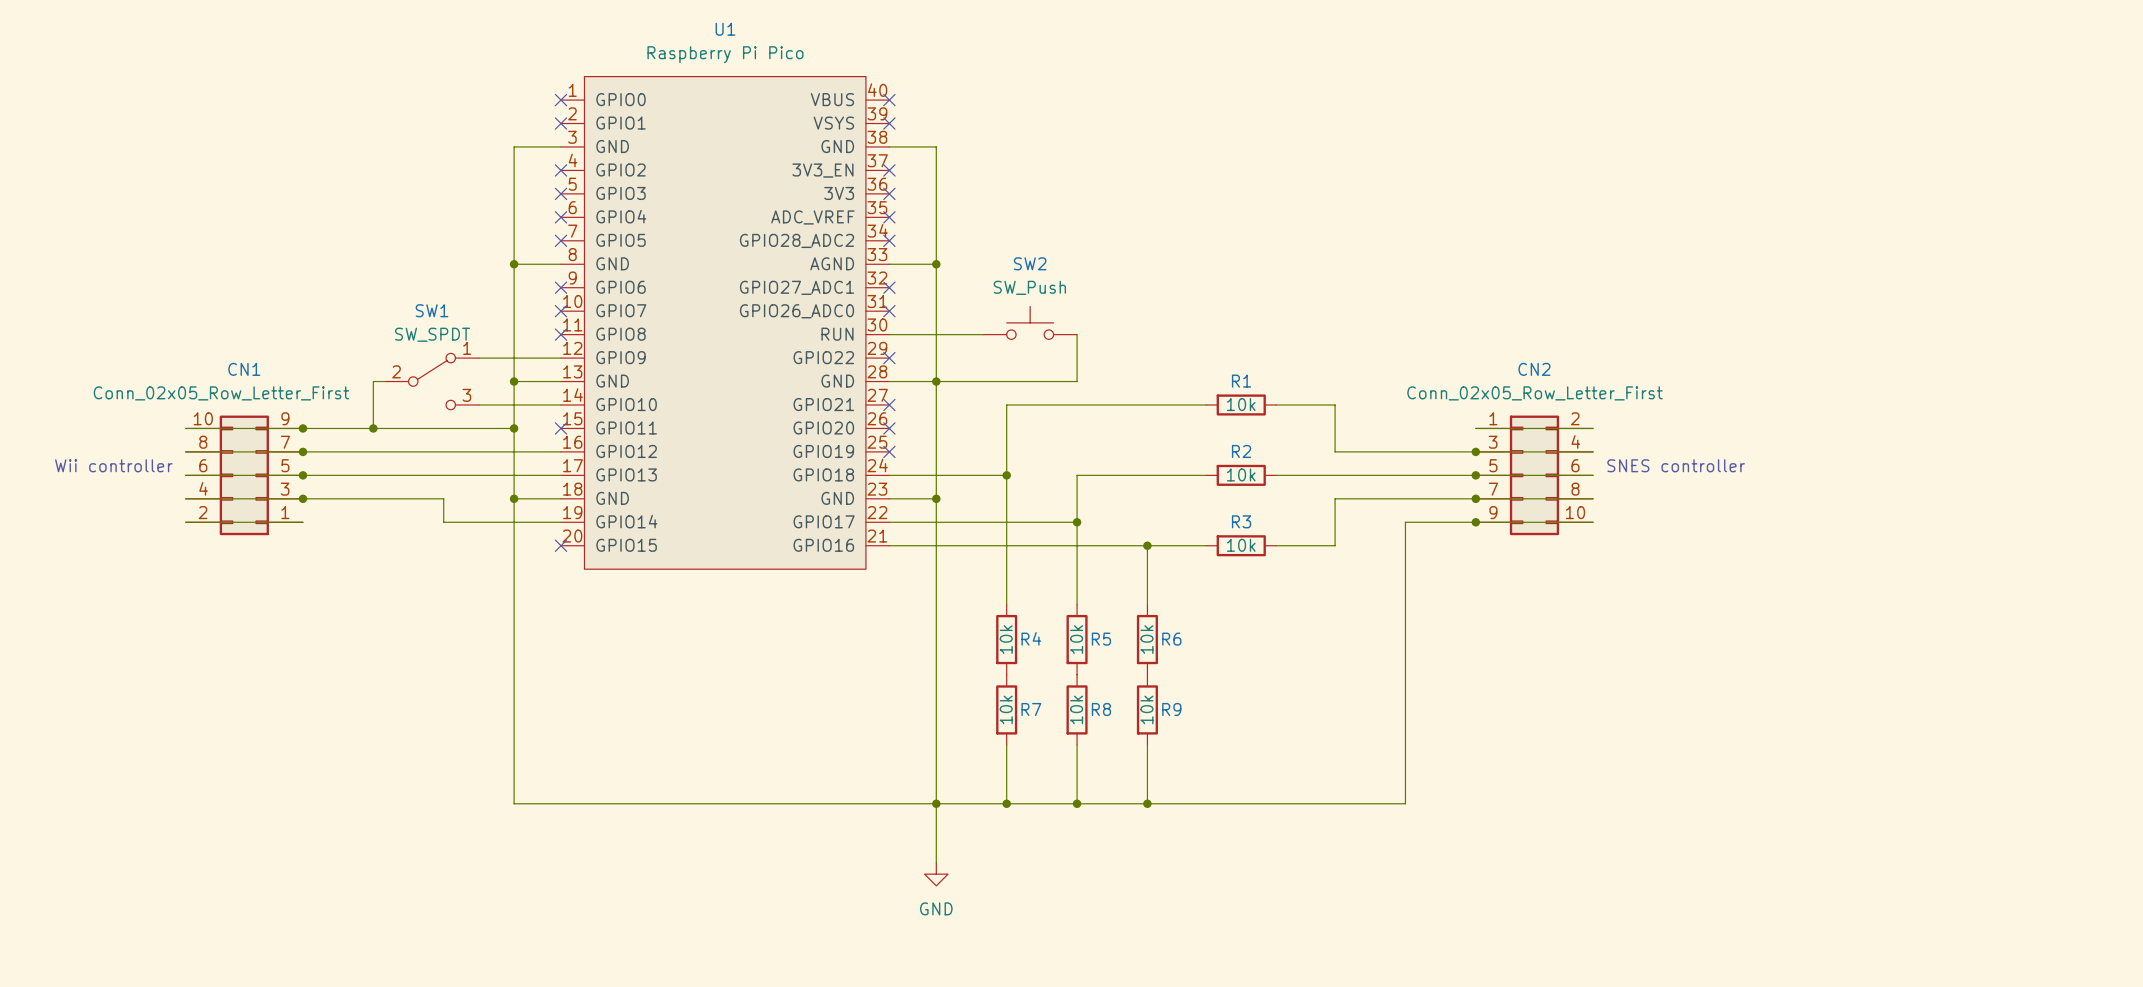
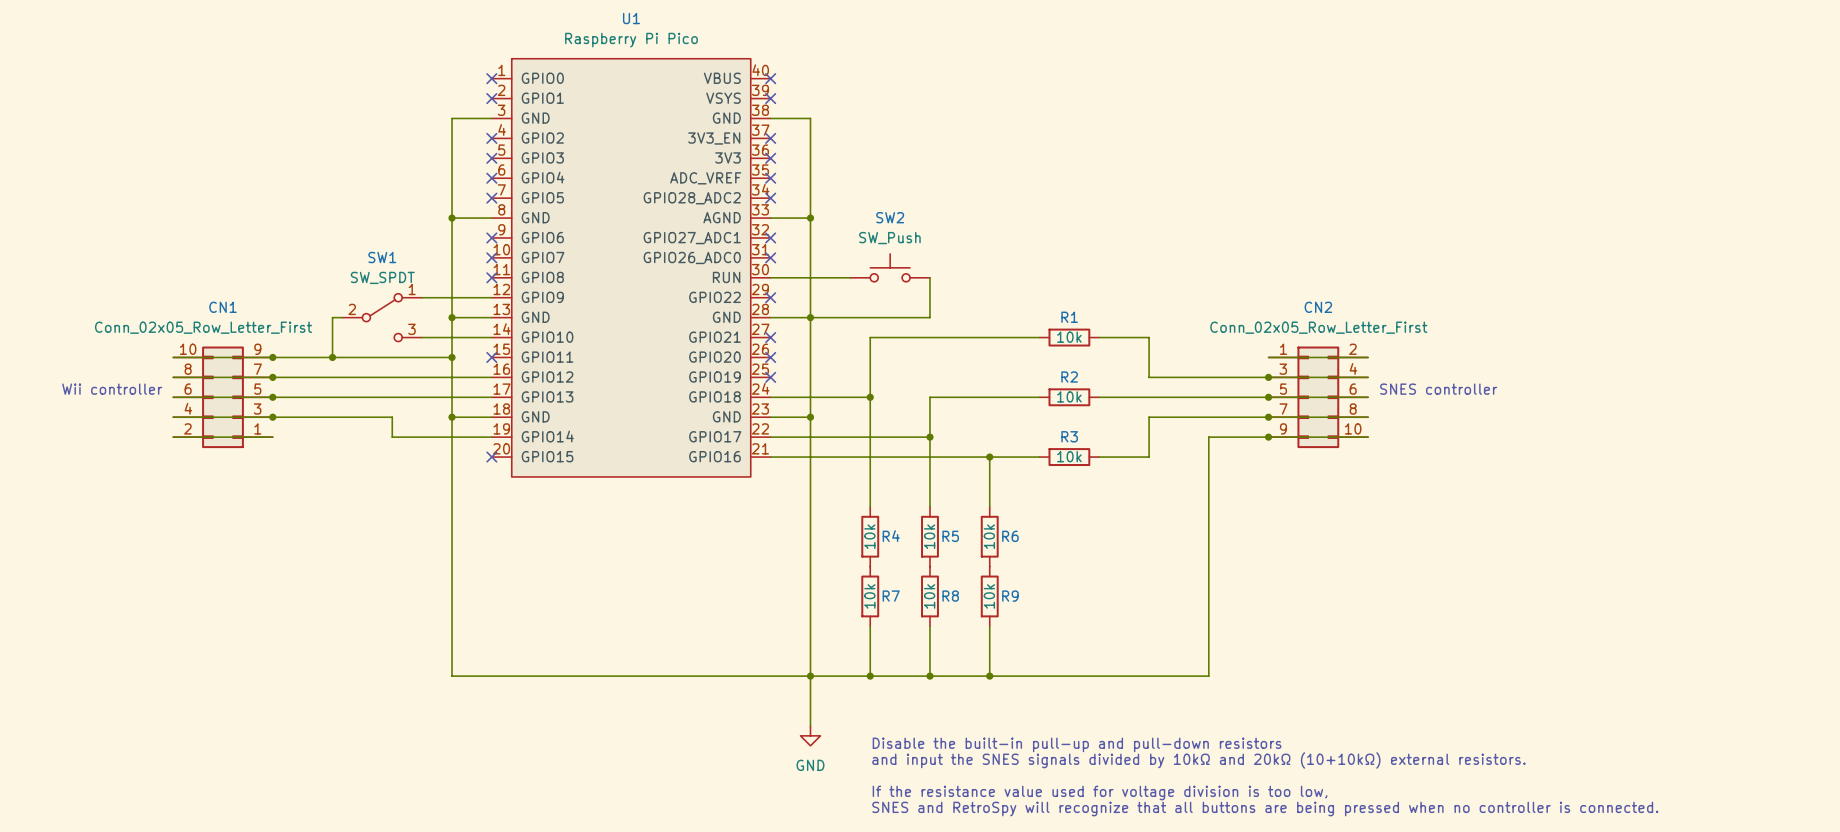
text: none -> Disable the built-in pull-up and pull-down resistors (1077, 744)
text: none -> and input the SNES signals divided by 10kΩ and 20kΩ (10+10kΩ) external resistors. (1198, 760)
text: none -> If the resistance value used for voltage division is too low, (1100, 792)
text: none -> SNES and RetroSpy will recognize that all buttons are being pressed when no controller is connected. (1265, 809)

